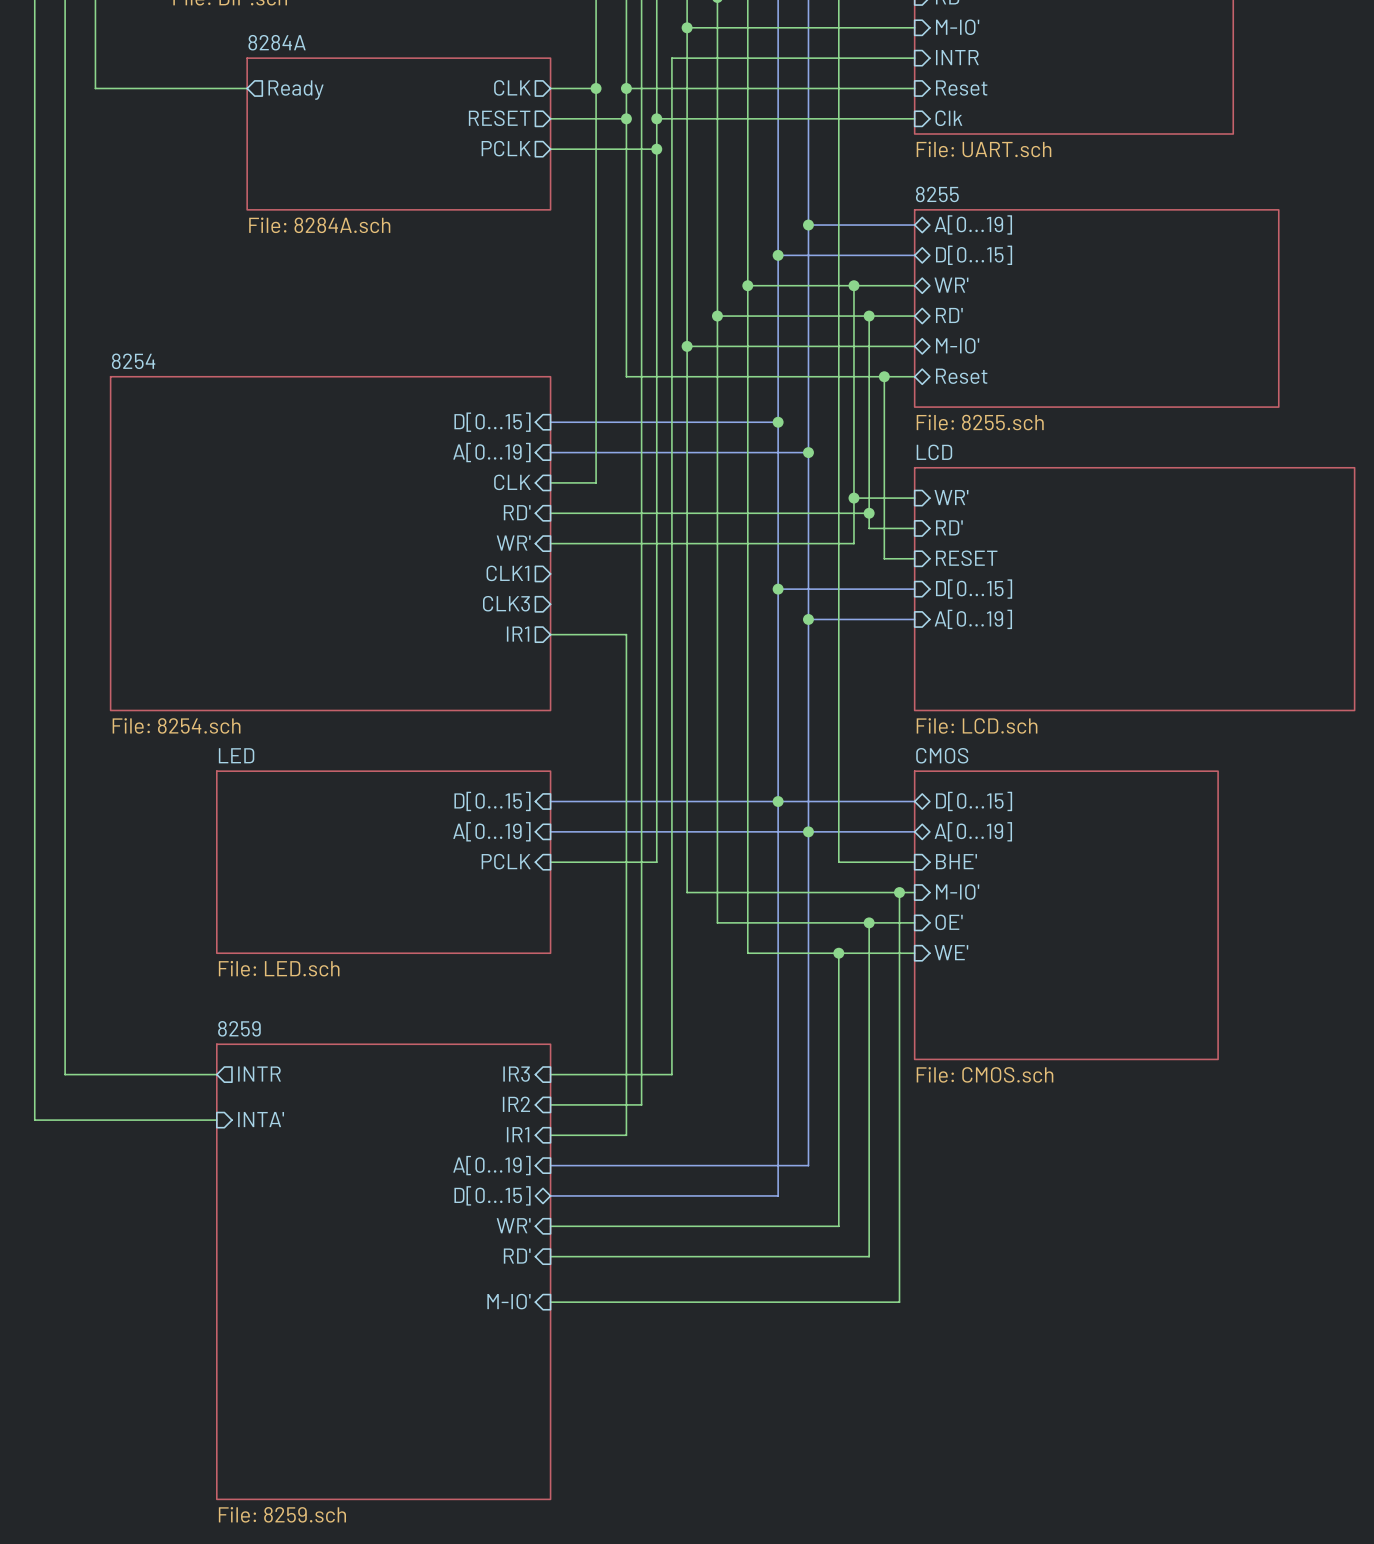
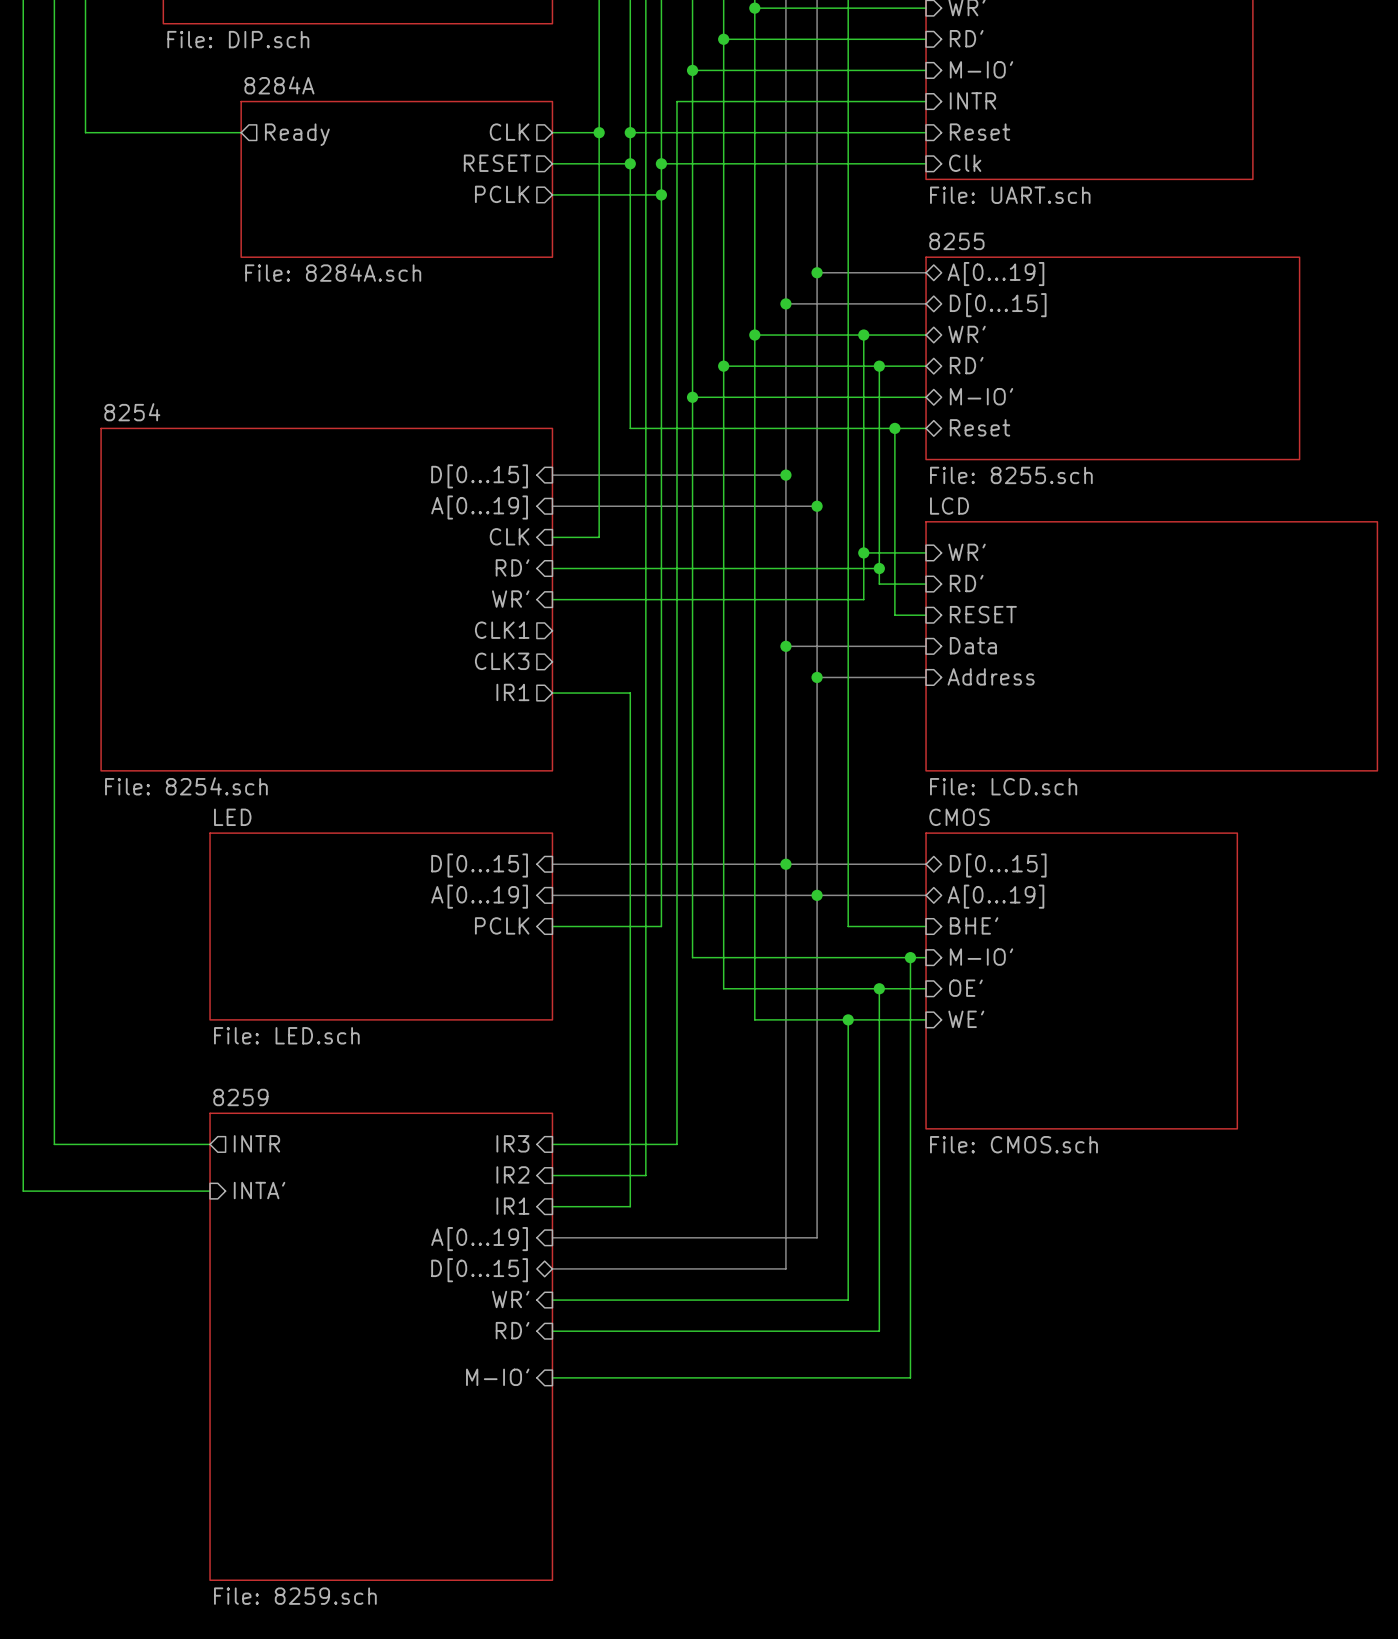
sheet pin: D[0...15] (974, 589) -> Data (973, 645)
sheet pin: A[0...19] (973, 619) -> Address (991, 676)

